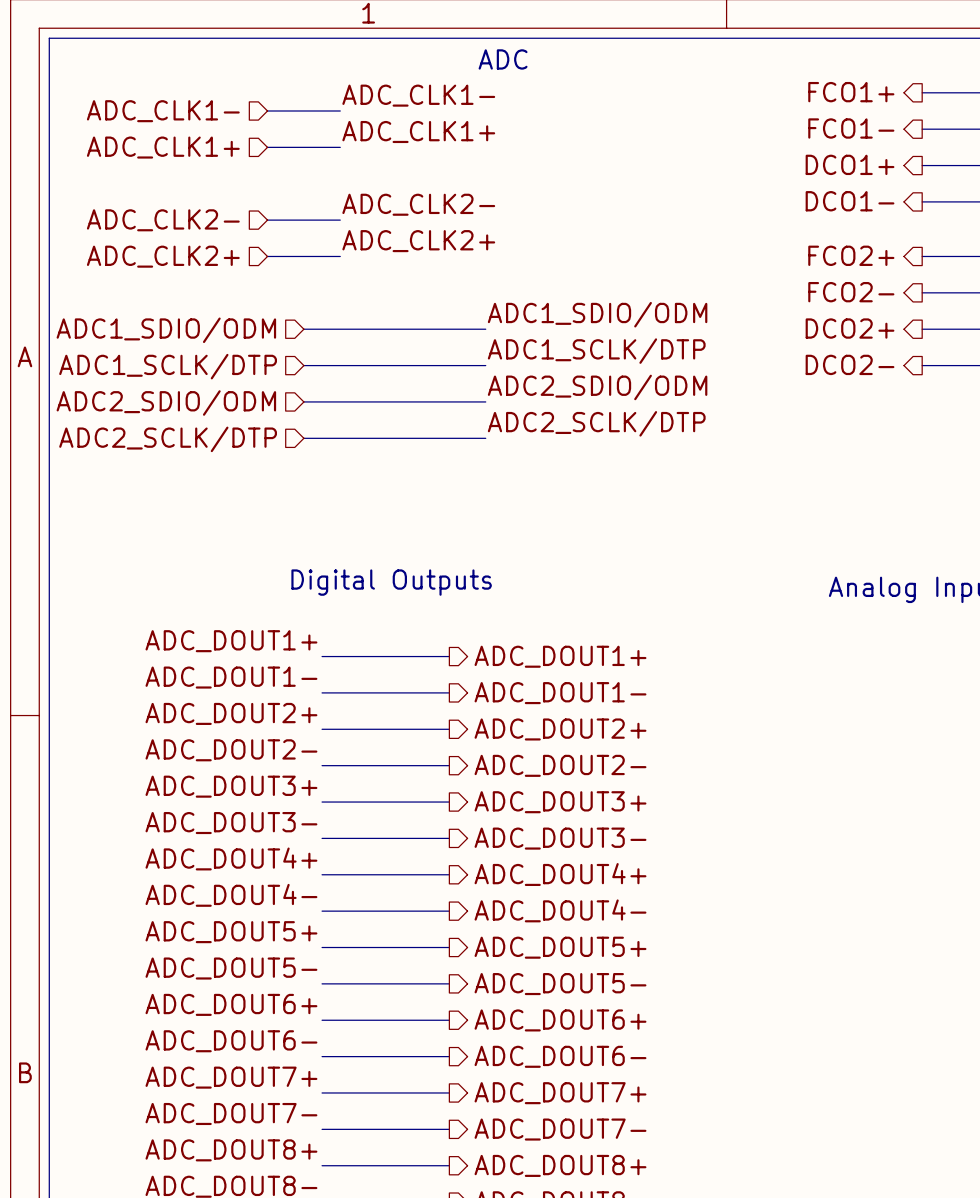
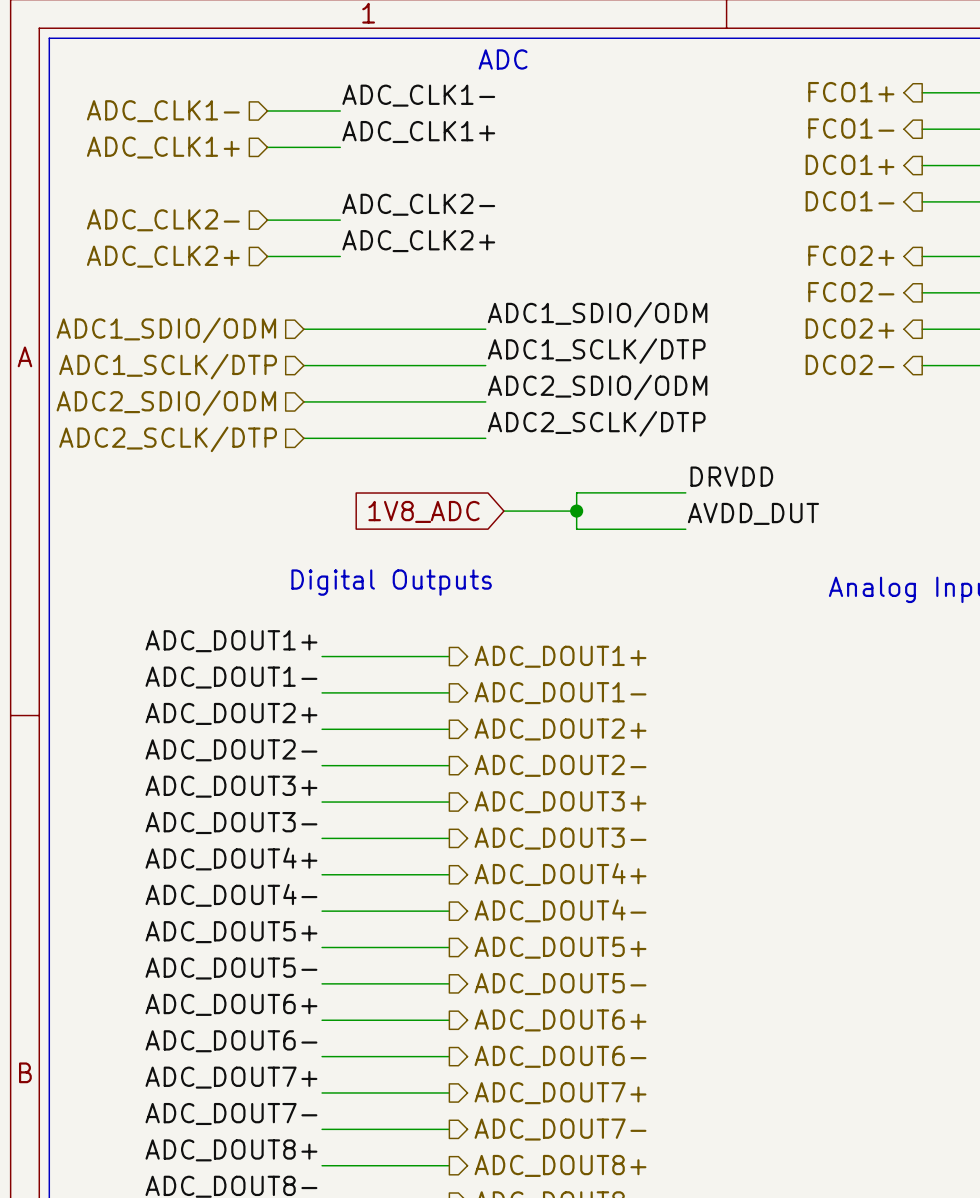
label: none -> DRVDD (731, 476)
wire: none -> (685, 492) (576, 492) (576, 529) (685, 529)
global label: none -> 1V8_ADC (424, 511)
wire: none -> (503, 511) (576, 511)
junction: none -> (576, 511)
label: none -> AVDD_DUT (753, 513)

